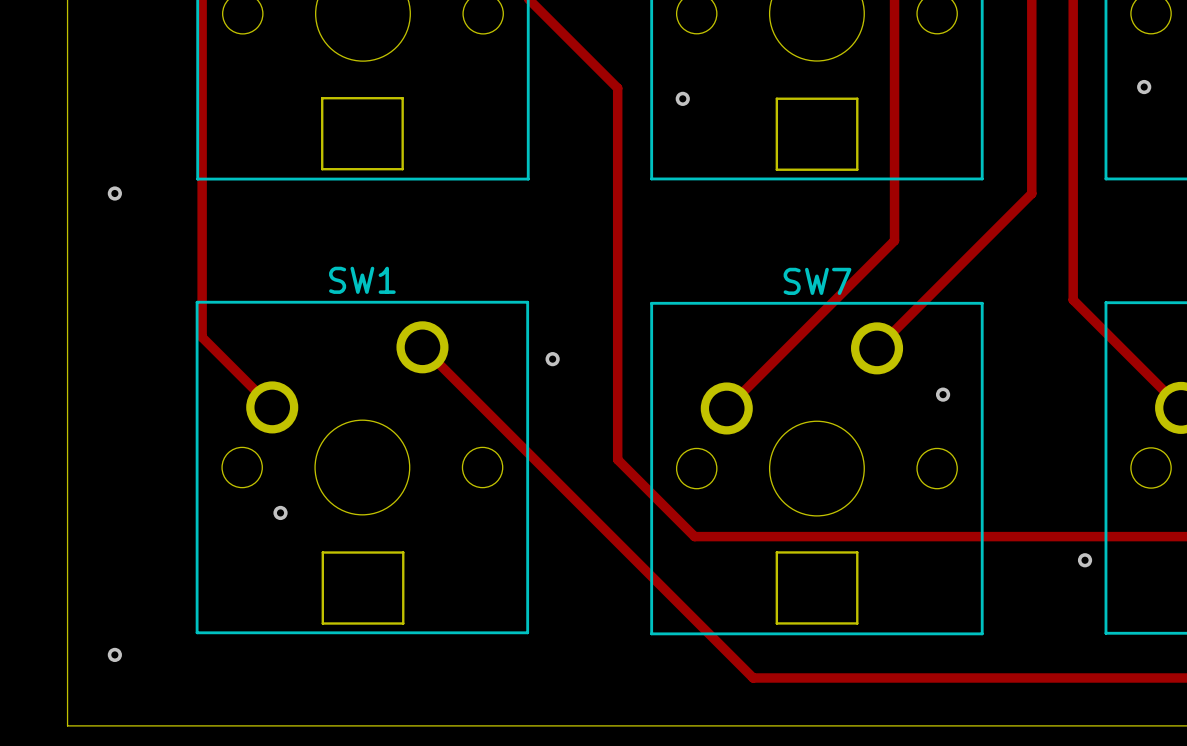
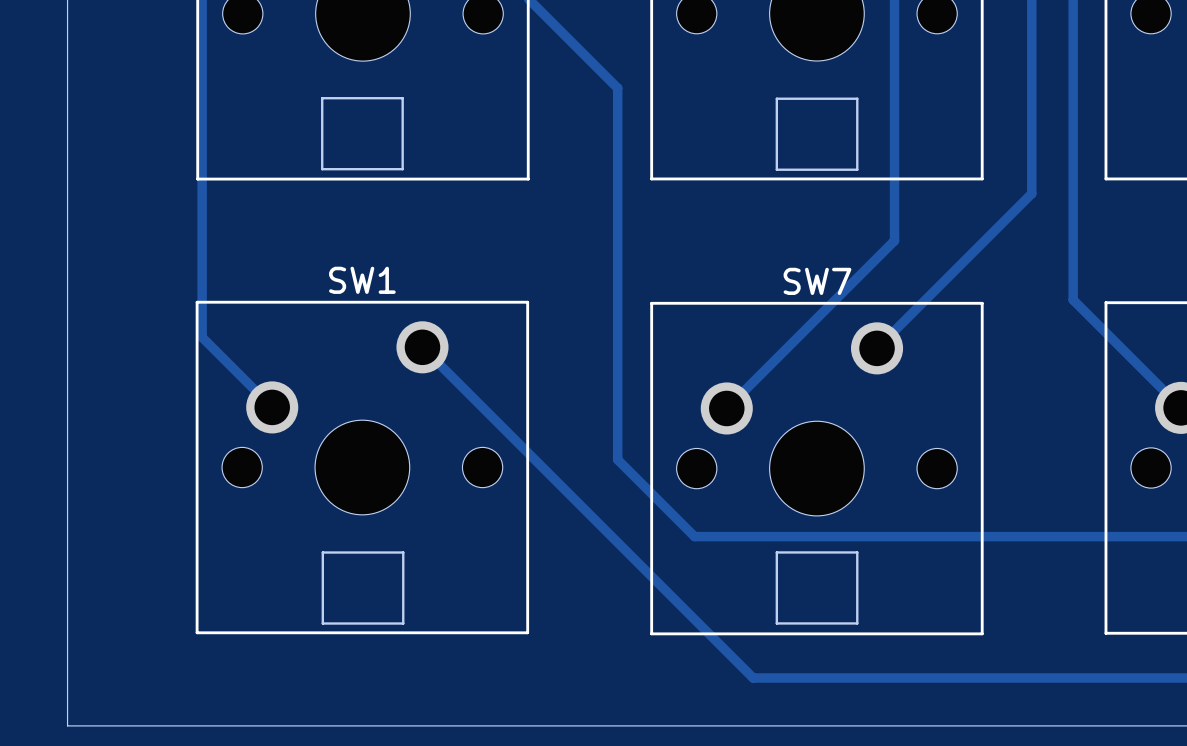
via: (1144, 87) -> none
via: (682, 98) -> none
via: (114, 193) -> none
via: (552, 359) -> none
via: (943, 394) -> none
via: (280, 512) -> none
via: (1085, 560) -> none
via: (114, 654) -> none

